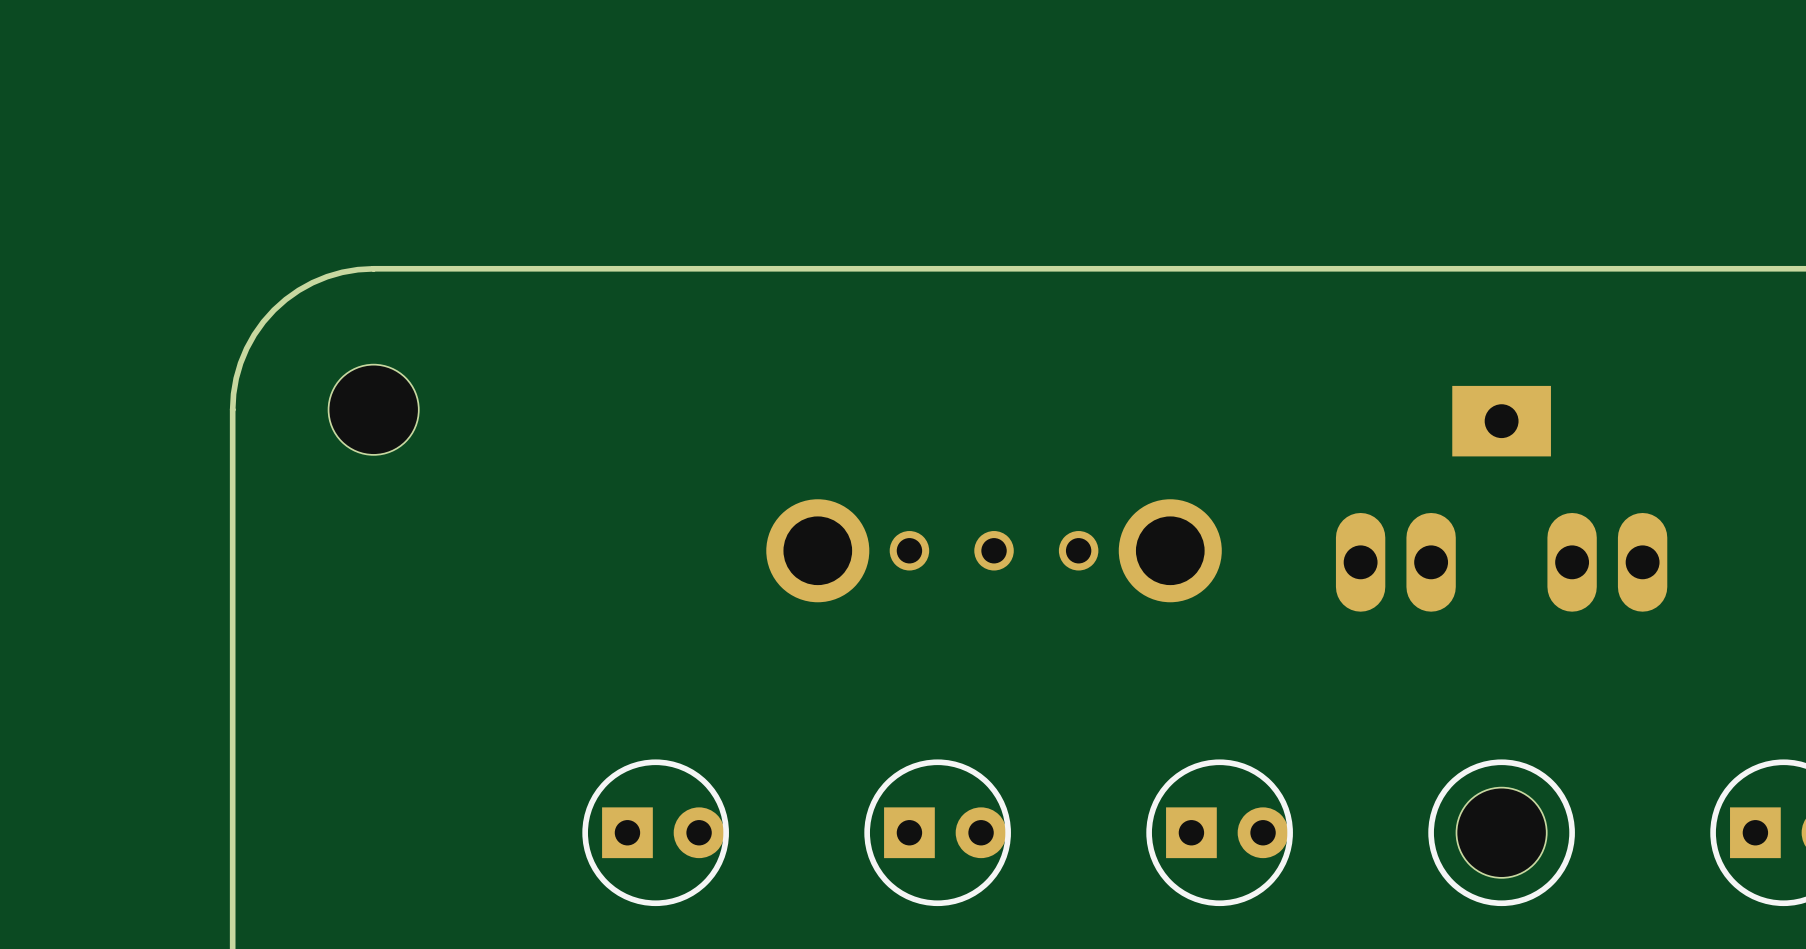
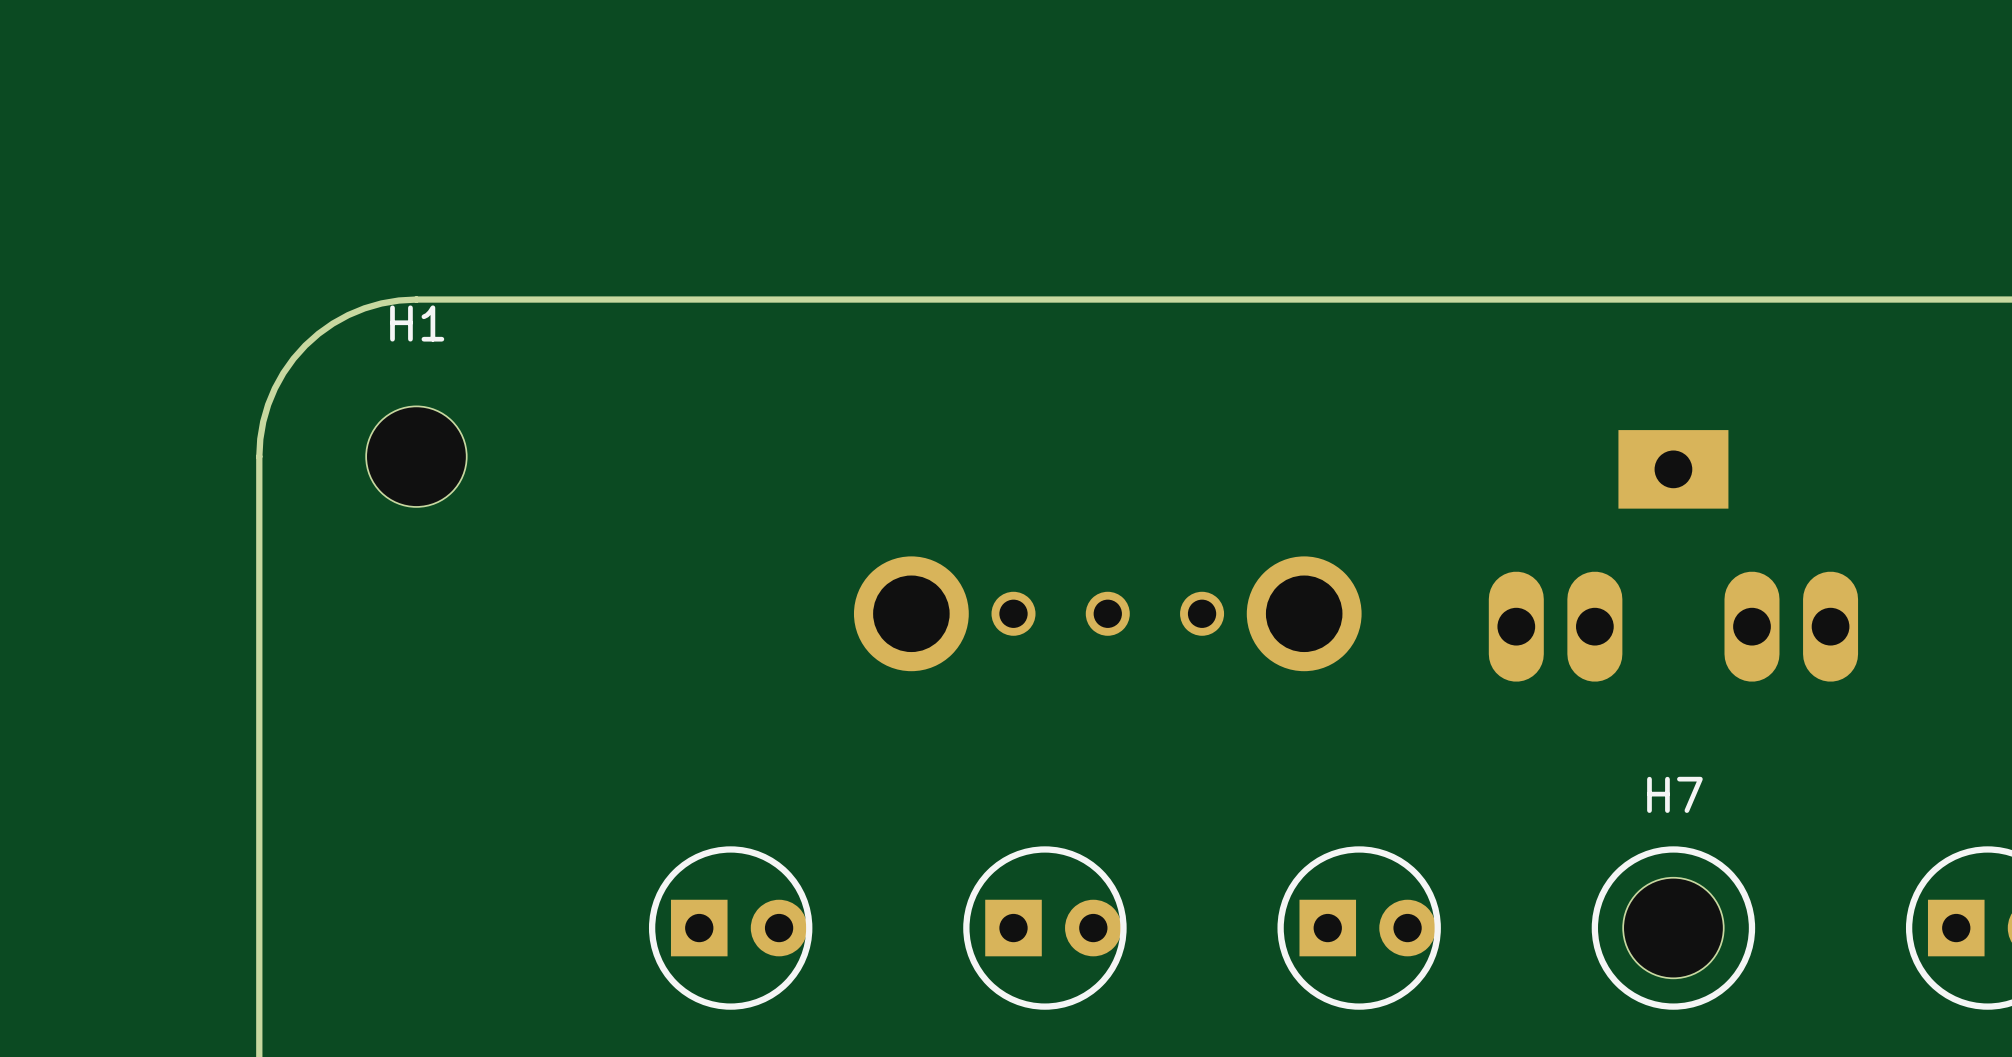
H1 name: none -> H1 (417, 323)
H7 name: none -> H7 (1674, 794)

